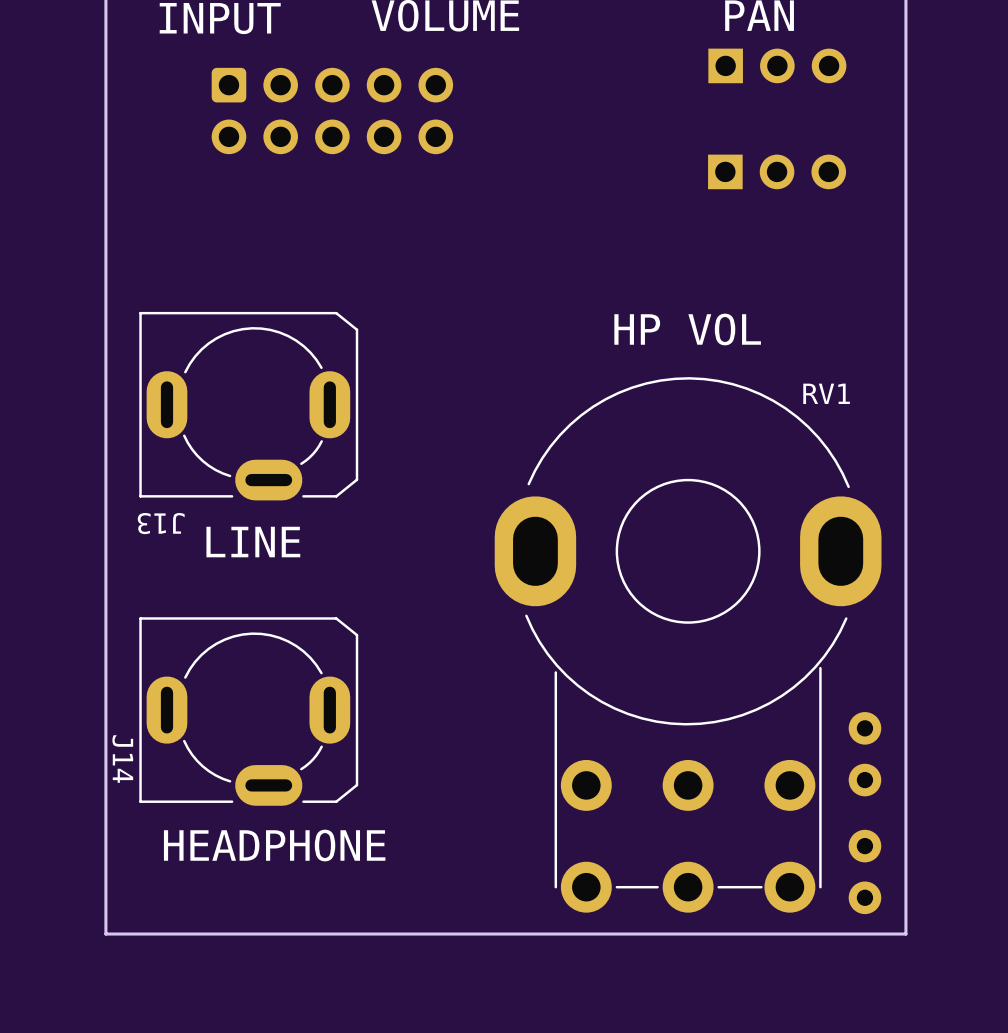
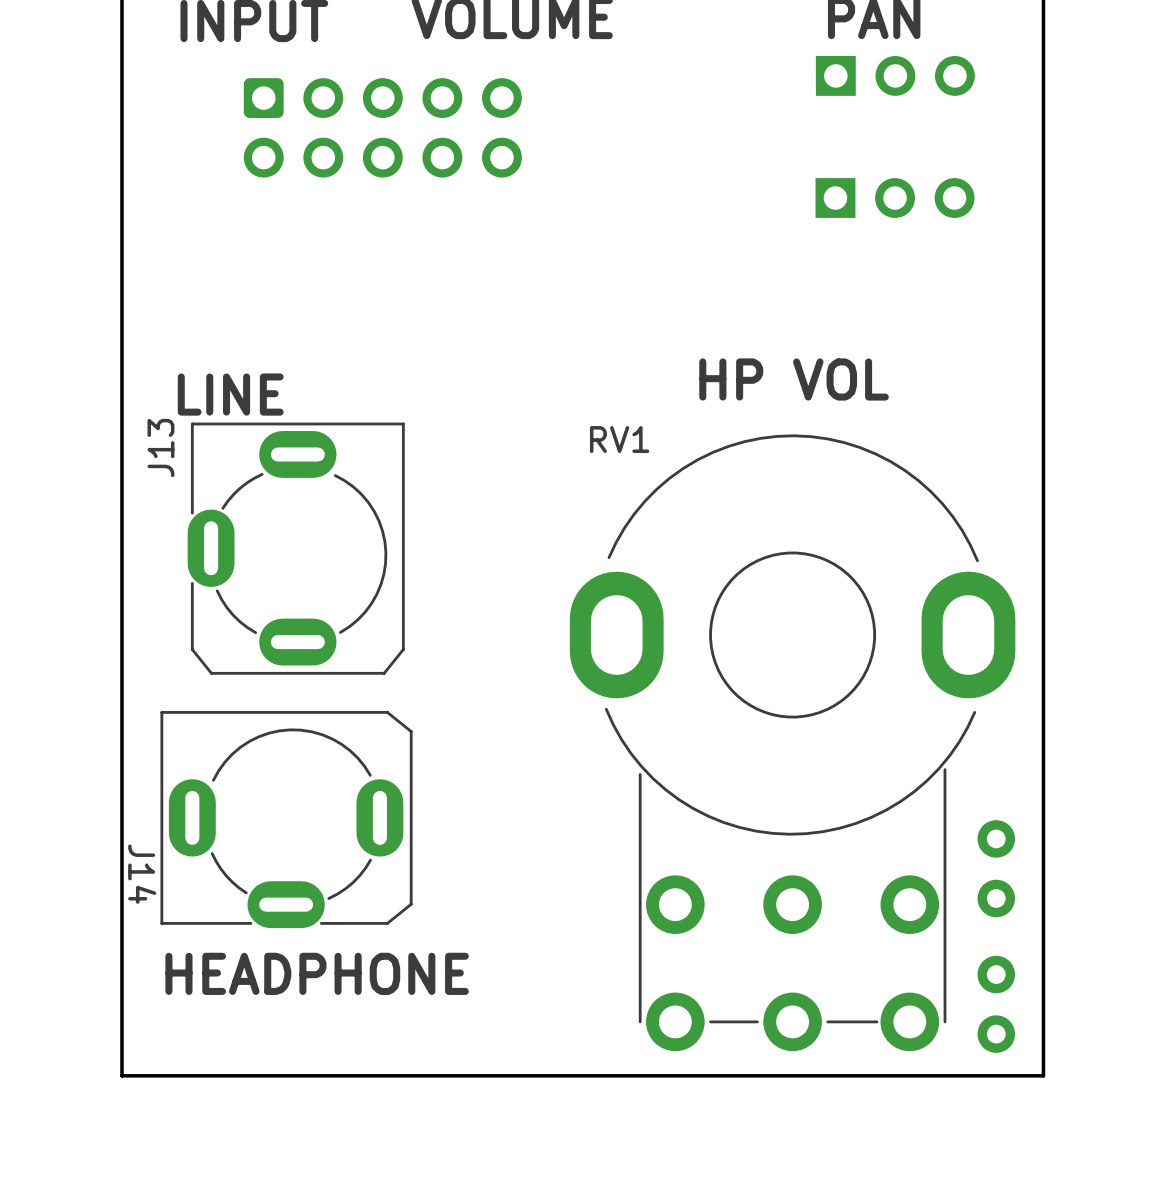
J13 footprint: [139, 311, 359, 501] -> [187, 422, 405, 675]
RV1 name position: RV1 (826, 393) -> RV1 (619, 439)
J13 name position: J13 (161, 523) -> J13 (160, 448)
text position: LINE (253, 542) -> LINE (230, 394)
J14 footprint: [139, 617, 359, 806] -> [160, 710, 413, 929]

